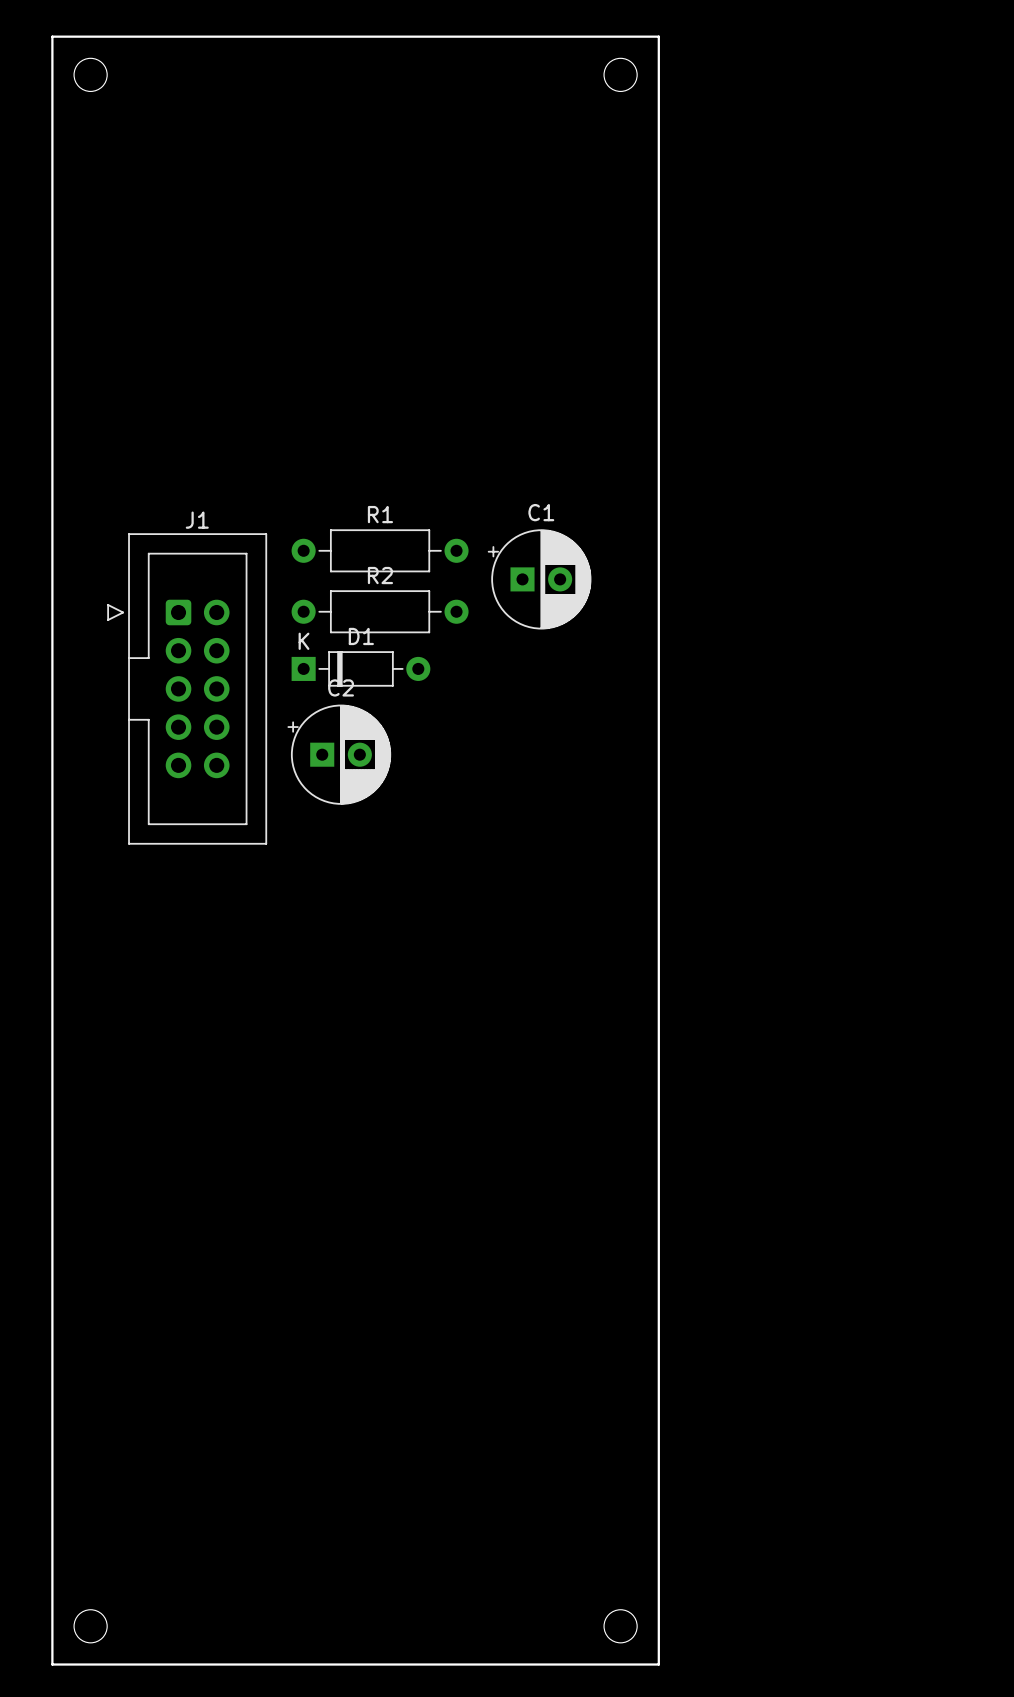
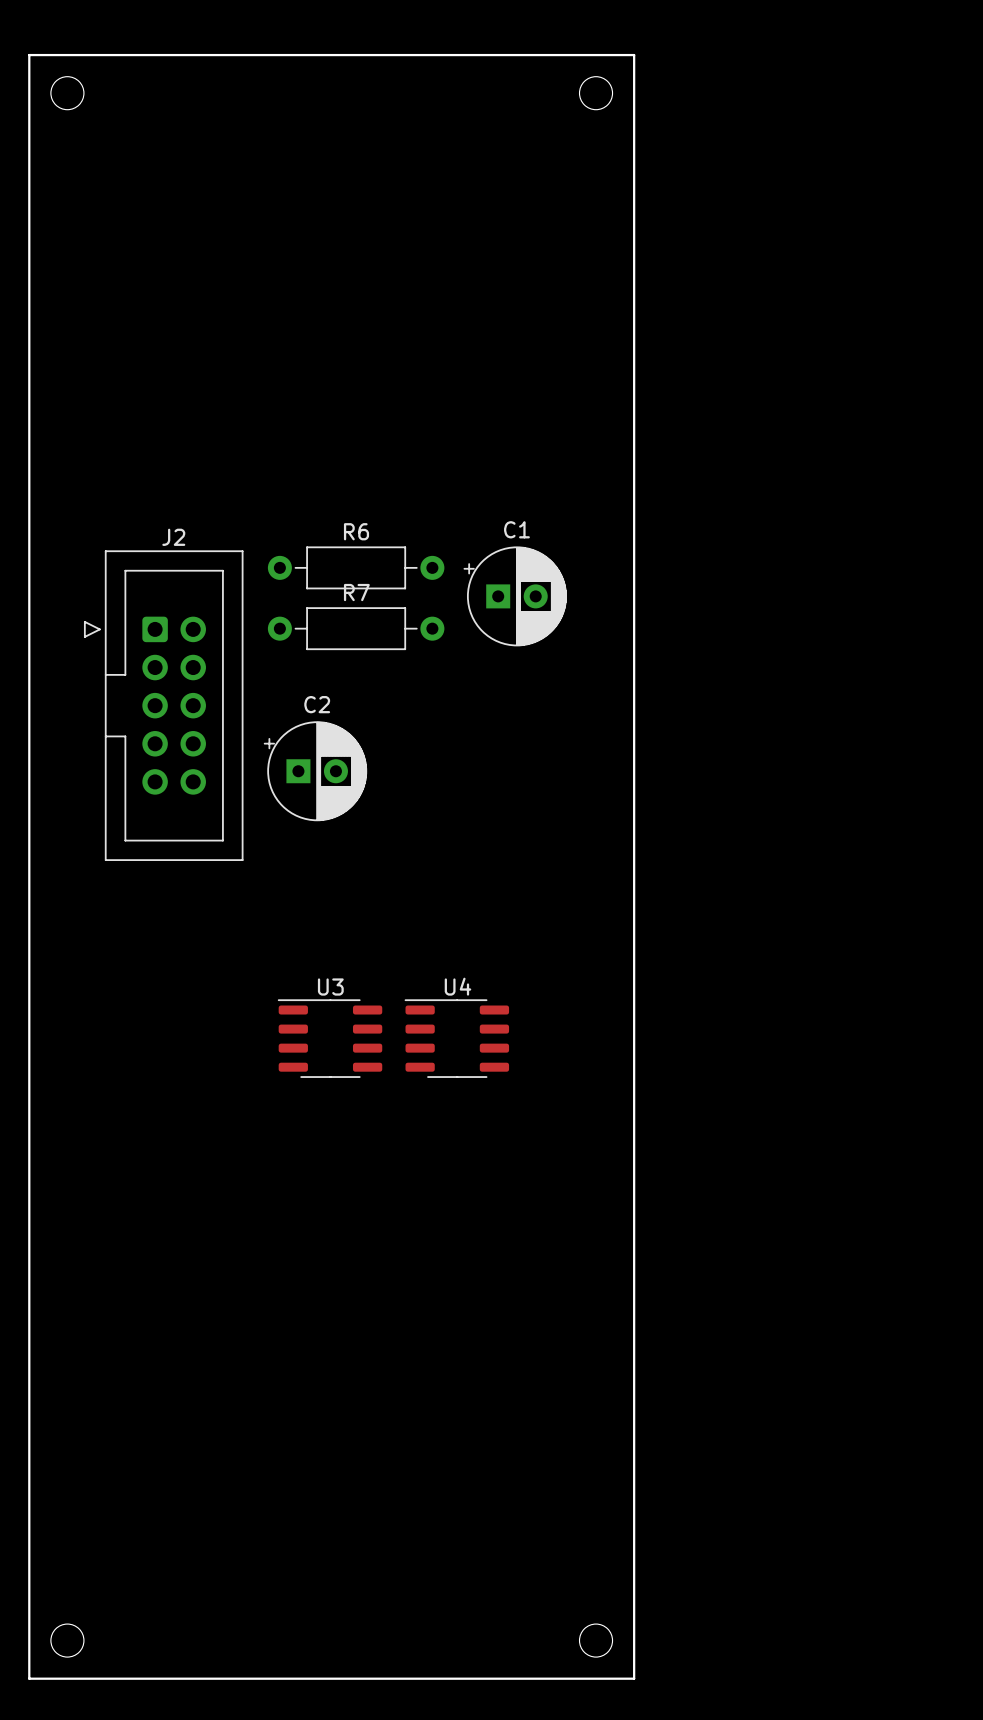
R1 name: R1 (380, 514) -> R6 (356, 531)
J1 name: J1 (197, 520) -> J2 (173, 537)
R2 name: R2 (380, 575) -> R7 (356, 592)
D1: (360, 668) -> none
U3: none -> (330, 1038)
U4: none -> (456, 1038)

